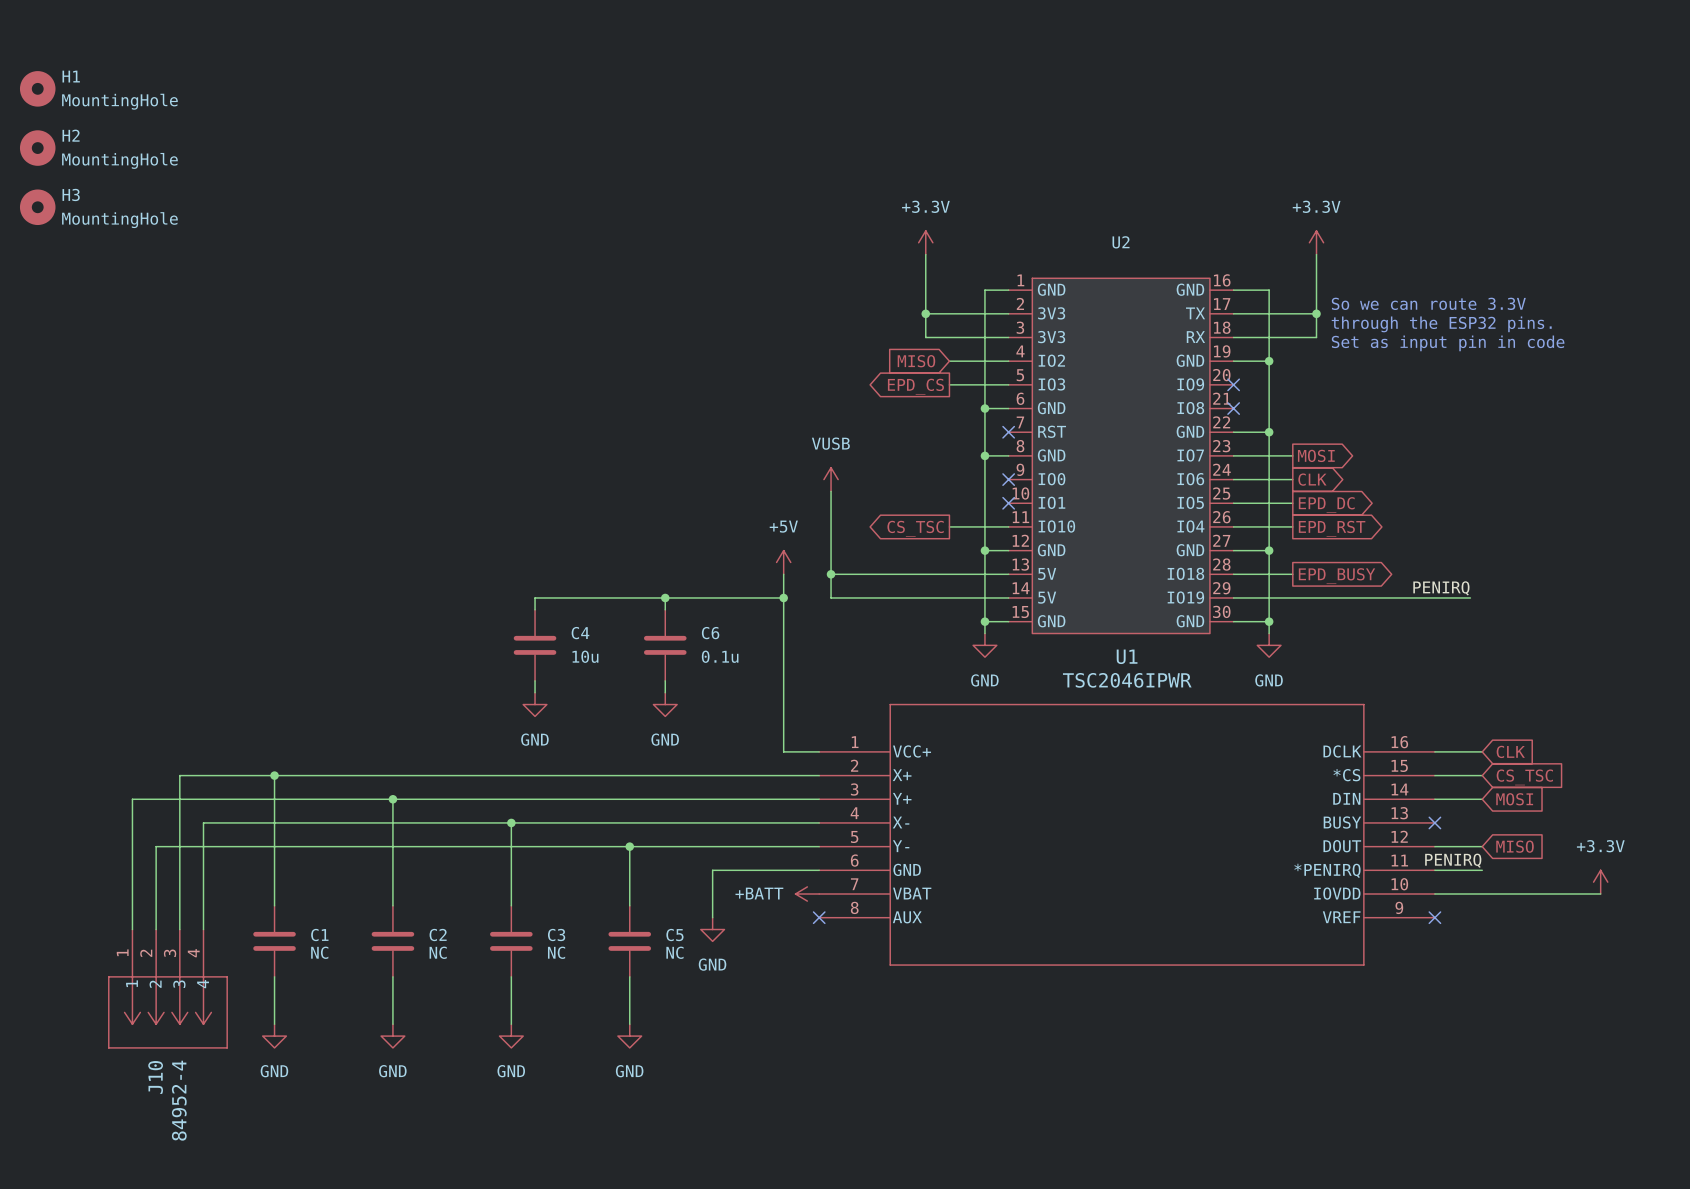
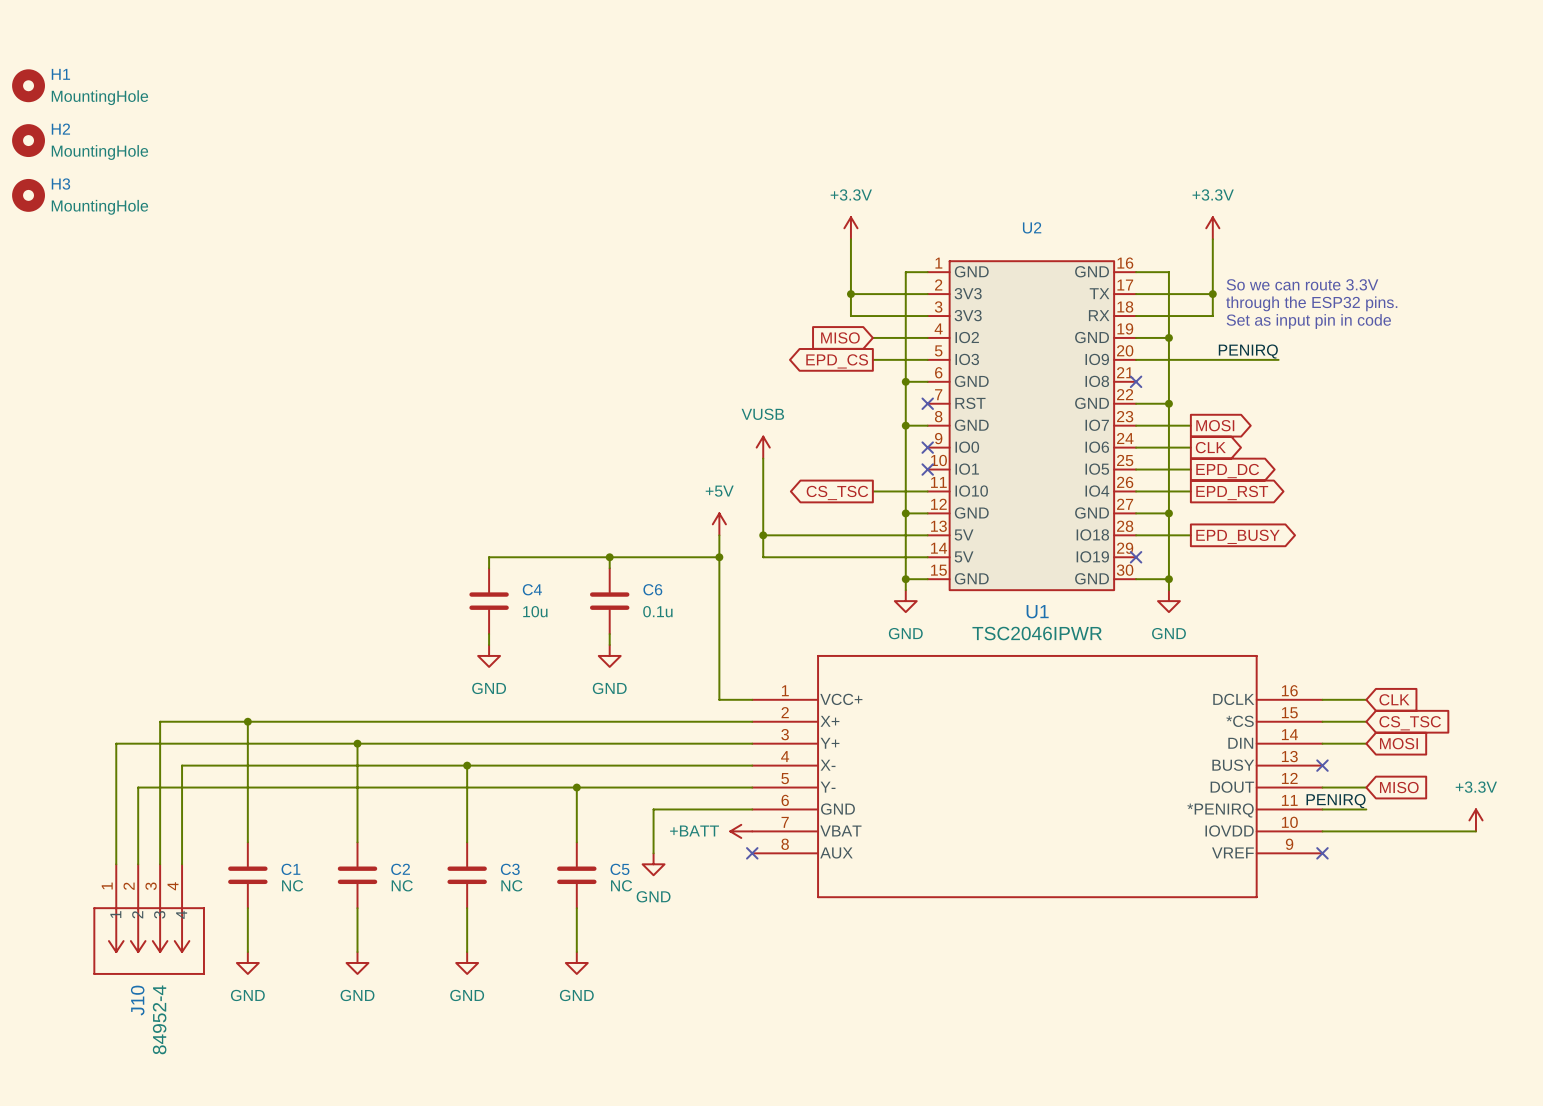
wire: none -> (1136, 359) (1278, 359)
no-connect mark: (1233, 384) -> none
label position: PENIRQ (1441, 588) -> PENIRQ (1248, 351)
wire: (1233, 597) (1470, 597) -> none
no-connect mark: none -> (1136, 557)

